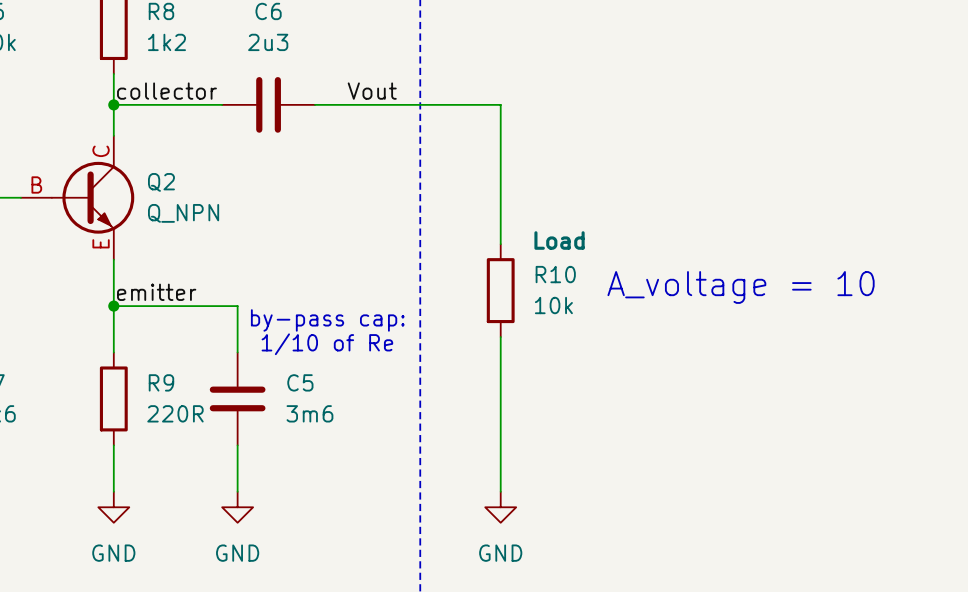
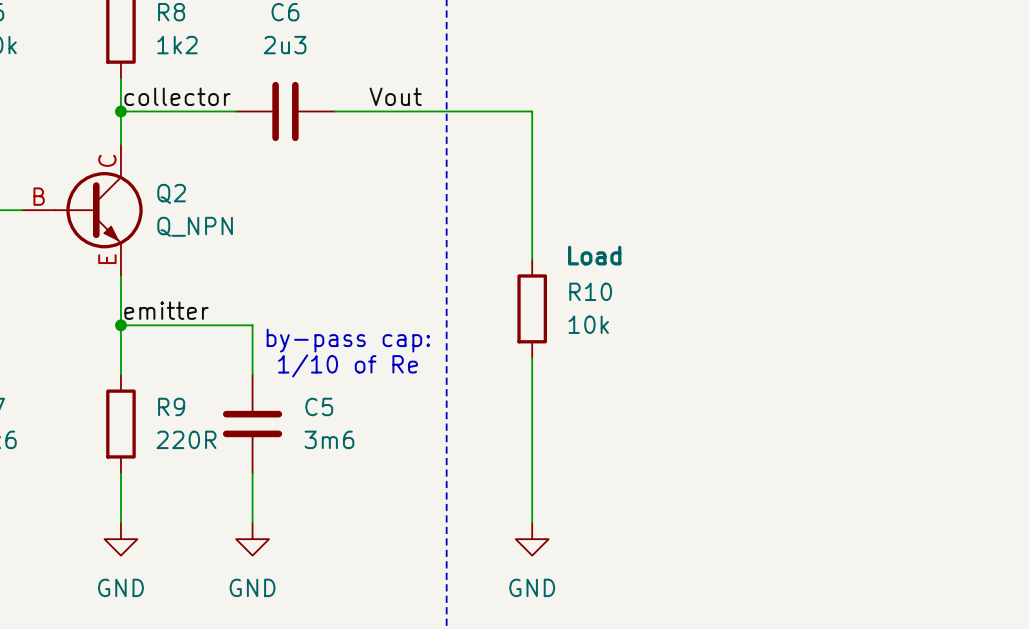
text: A_voltage = 10 (741, 287) -> none

